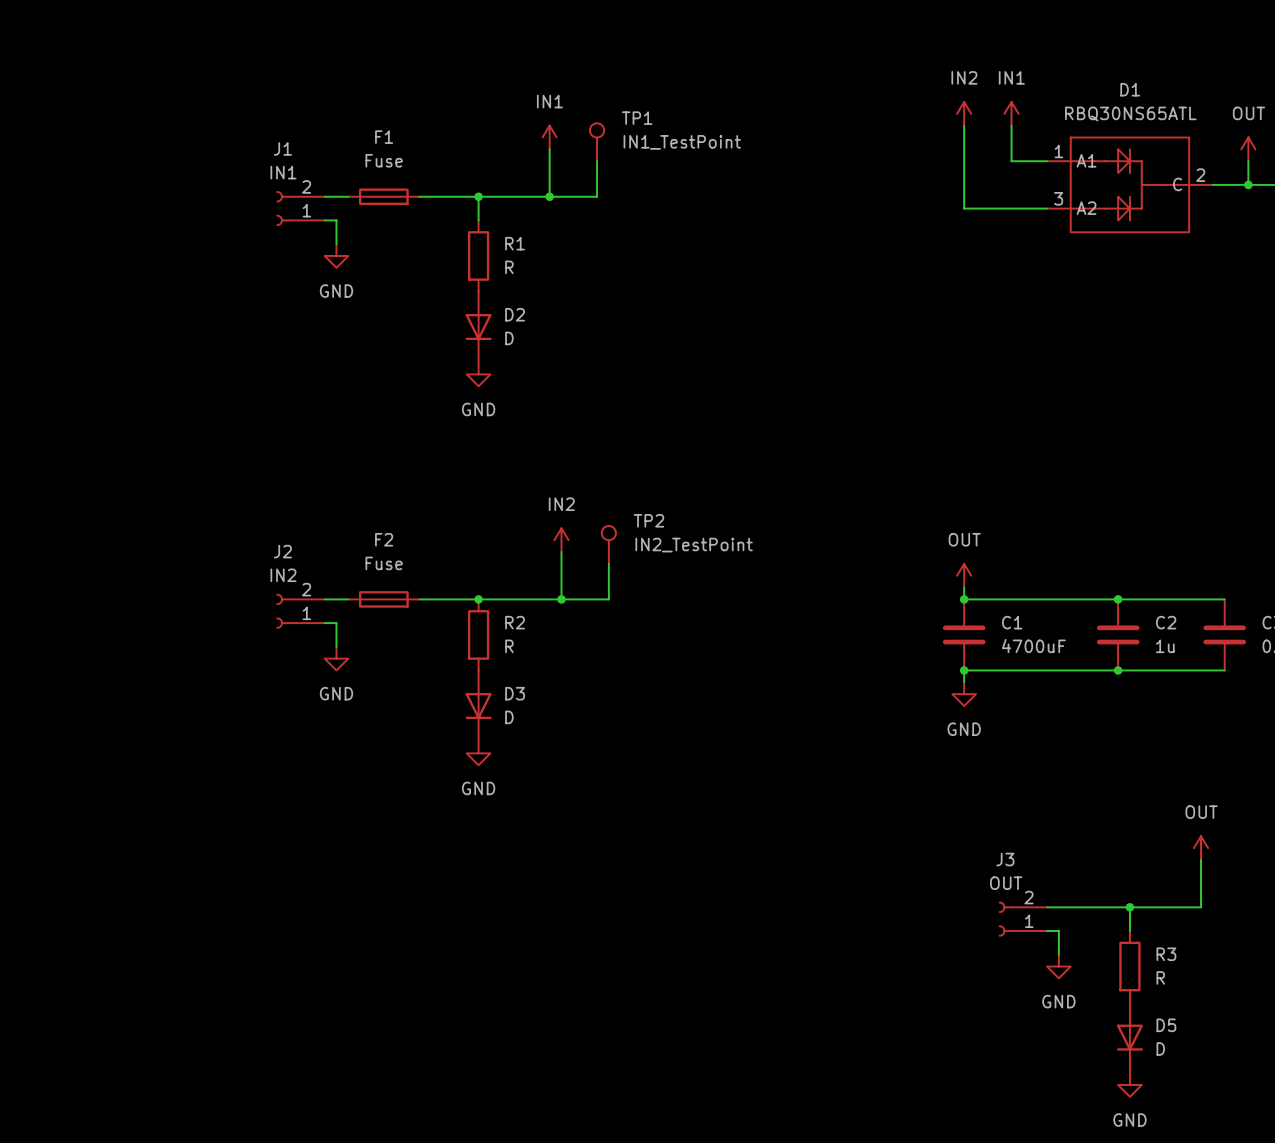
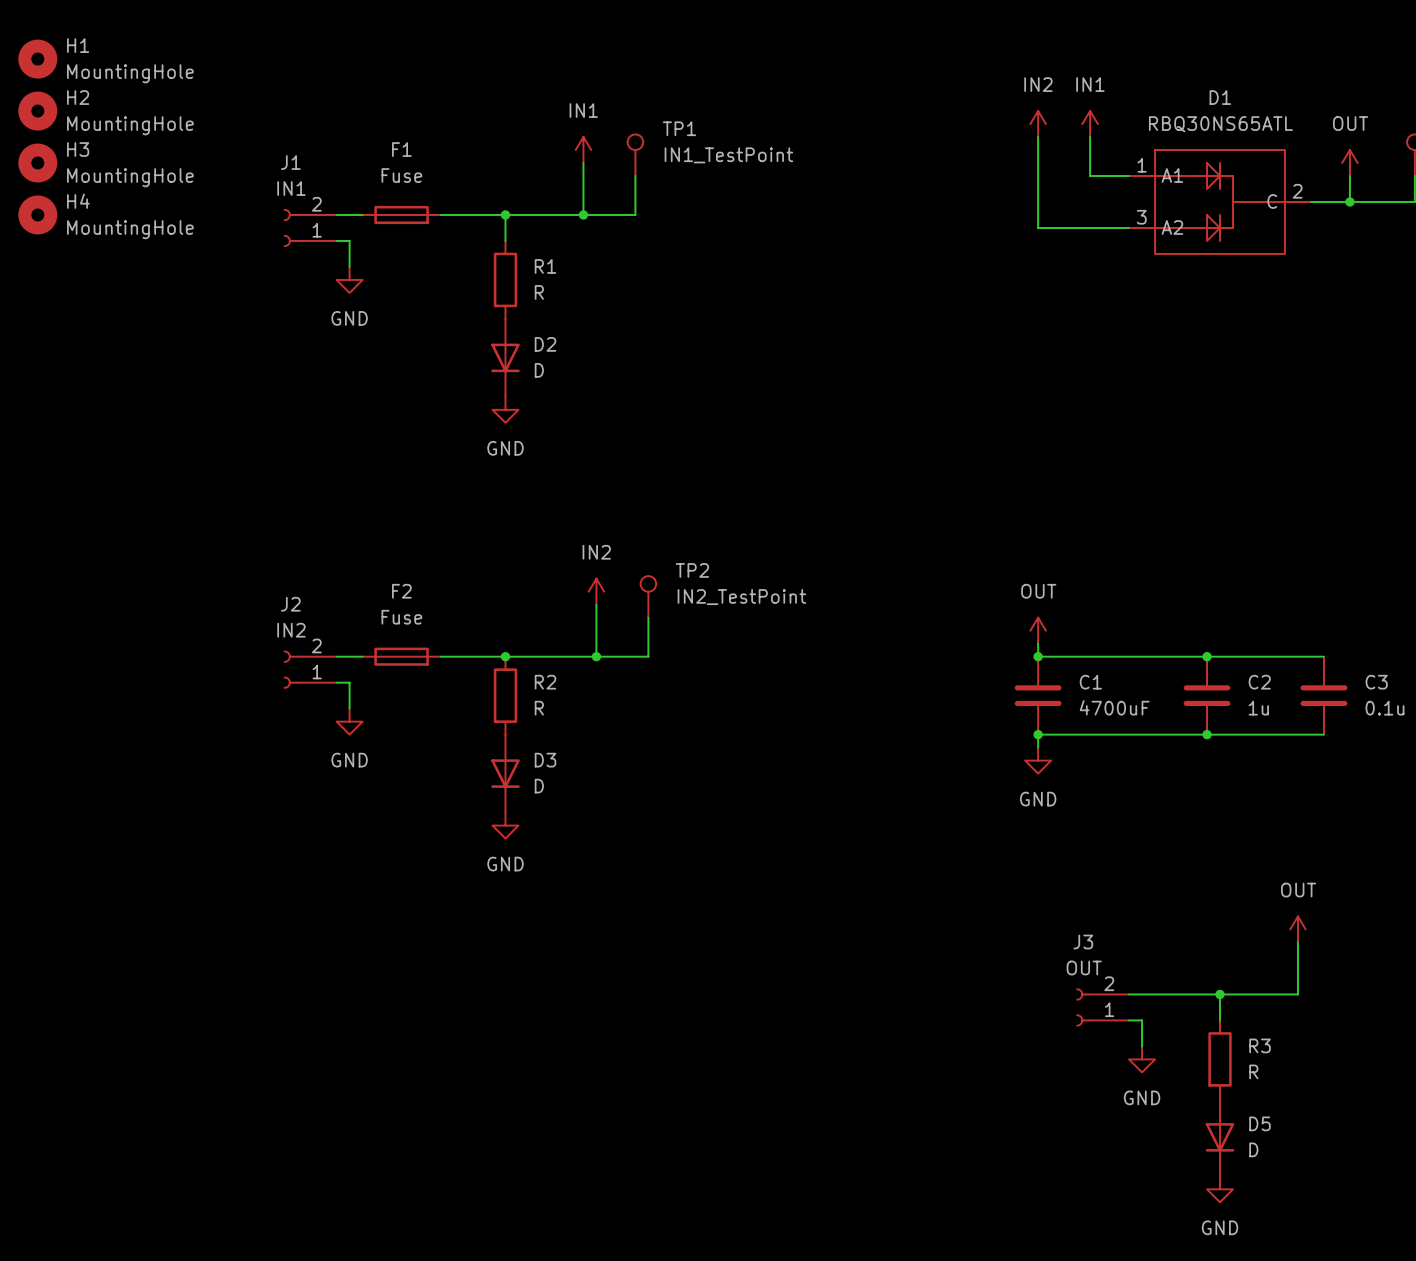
H1: none -> MountingHole (37, 59)
H2: none -> MountingHole (37, 111)
H3: none -> MountingHole (37, 163)
H4: none -> MountingHole (37, 214)

